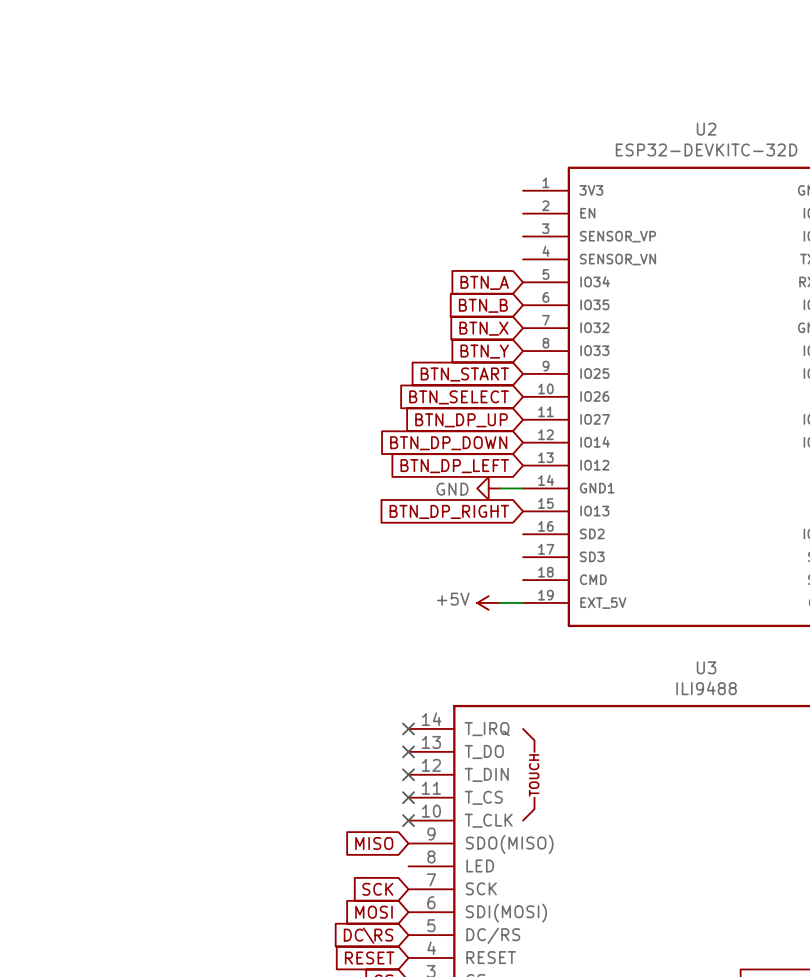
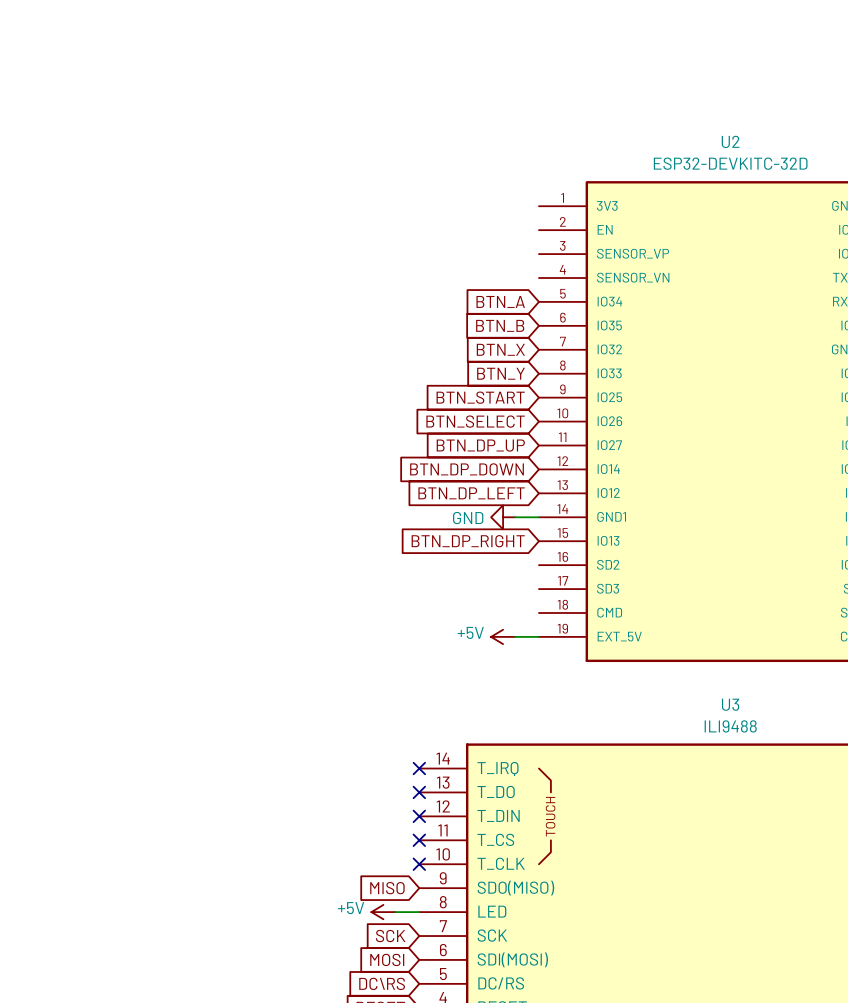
power symbol: none -> +5V (383, 912)
wire: none -> (395, 912) (419, 912)

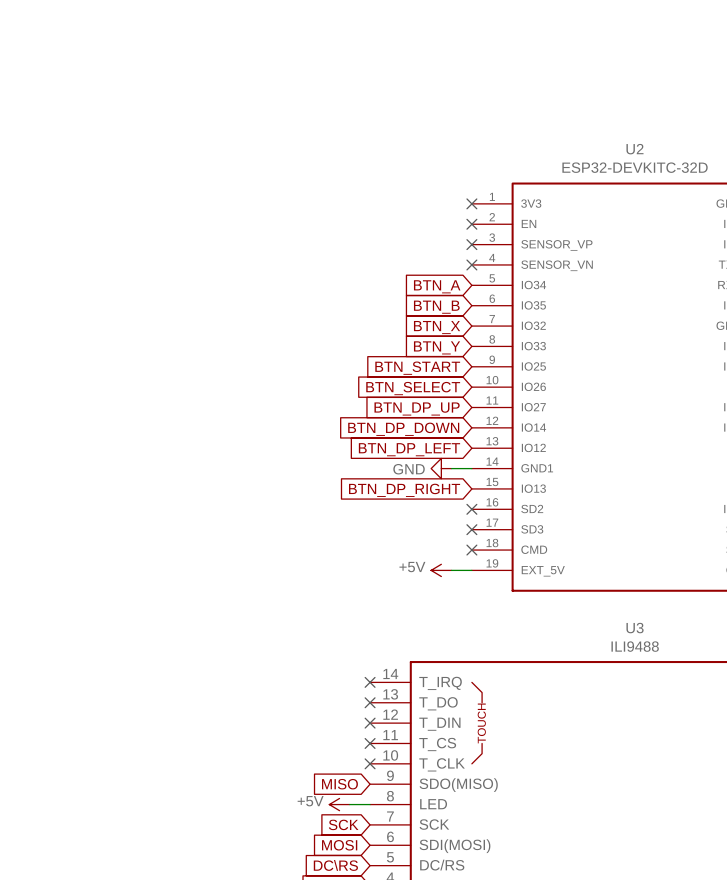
no-connect mark: none -> (471, 203)
no-connect mark: none -> (471, 224)
no-connect mark: none -> (471, 244)
no-connect mark: none -> (471, 264)
no-connect mark: none -> (471, 509)
no-connect mark: none -> (471, 529)
no-connect mark: none -> (471, 550)

